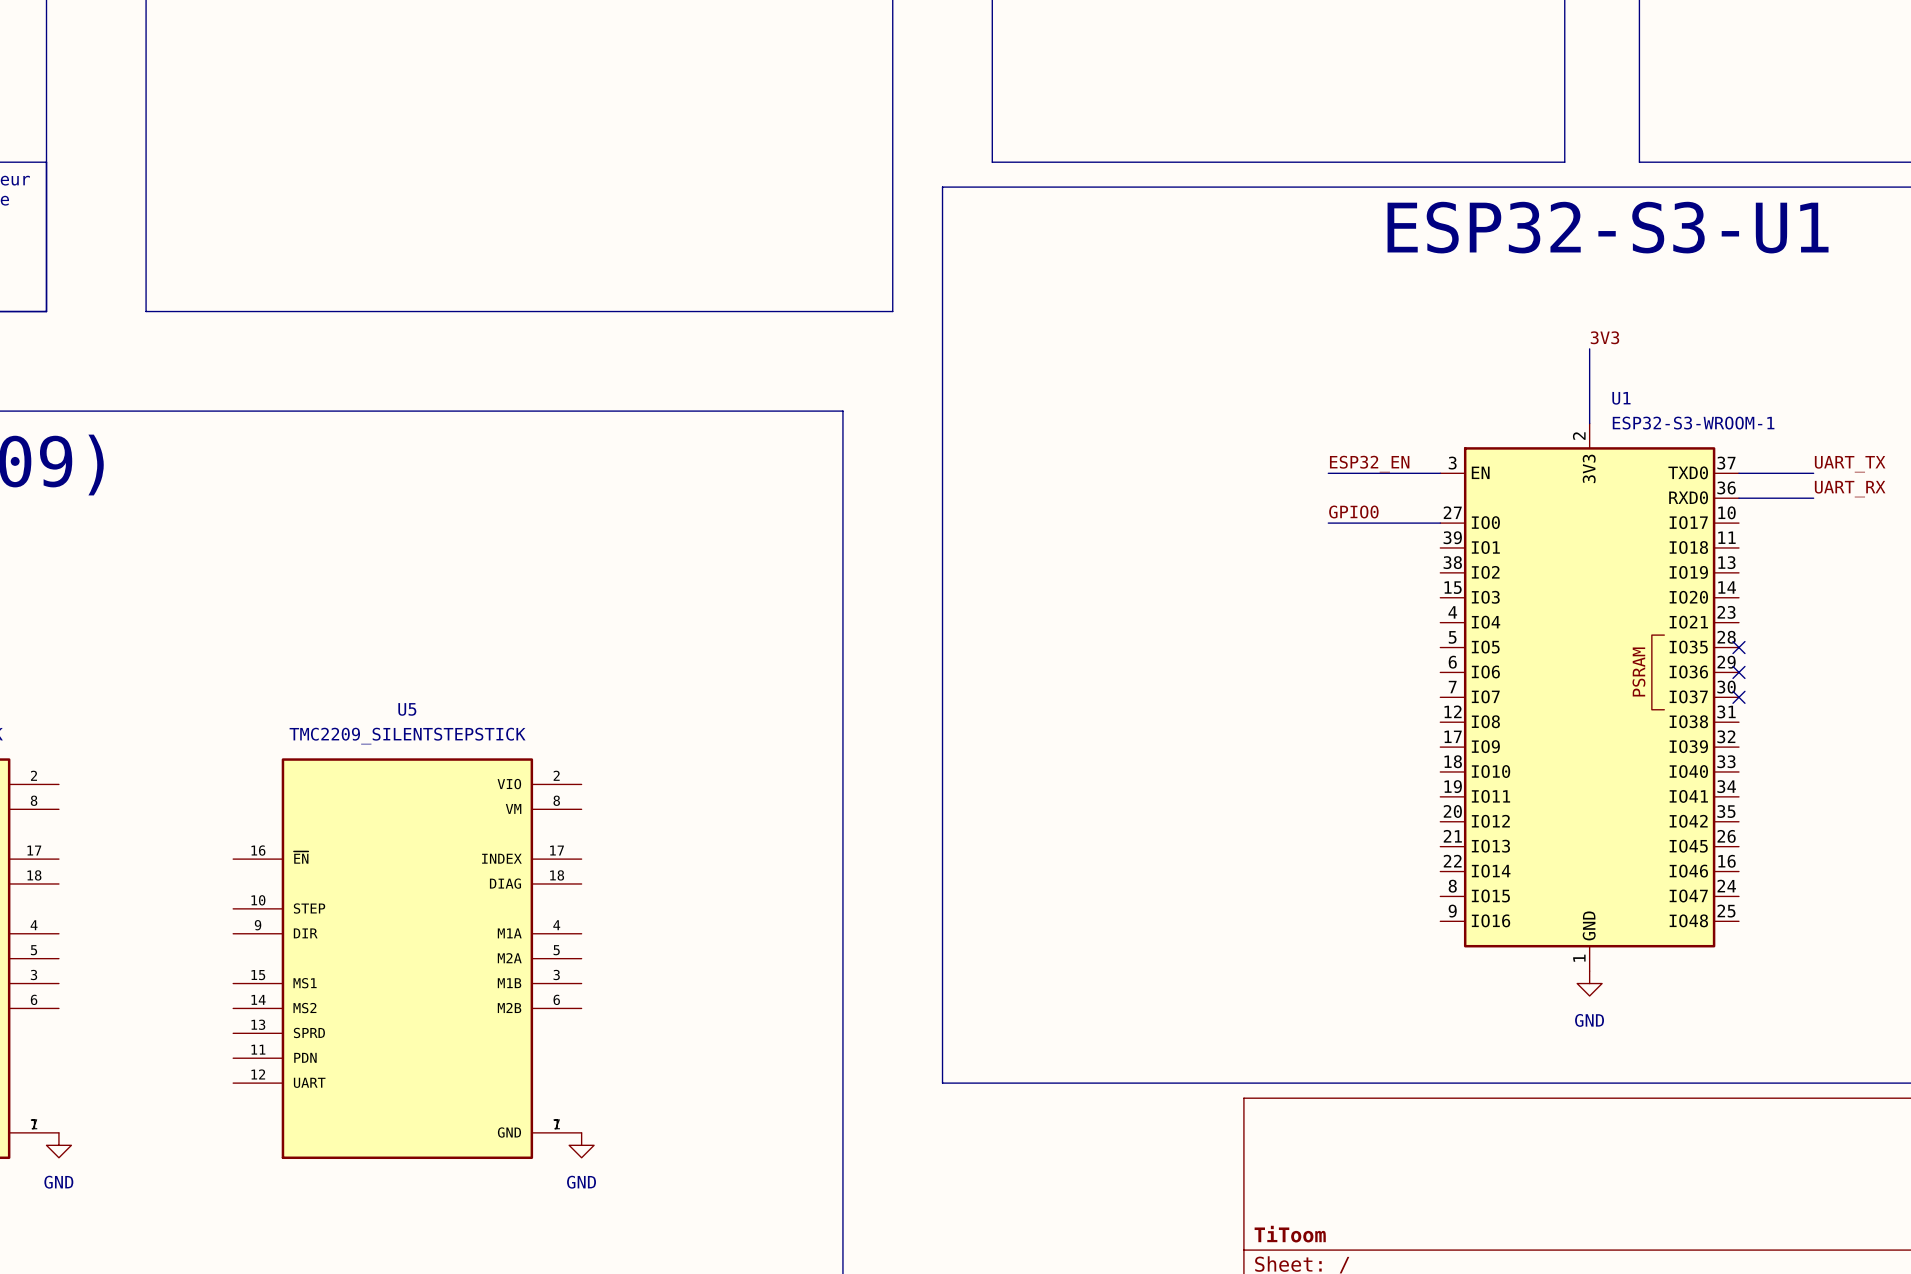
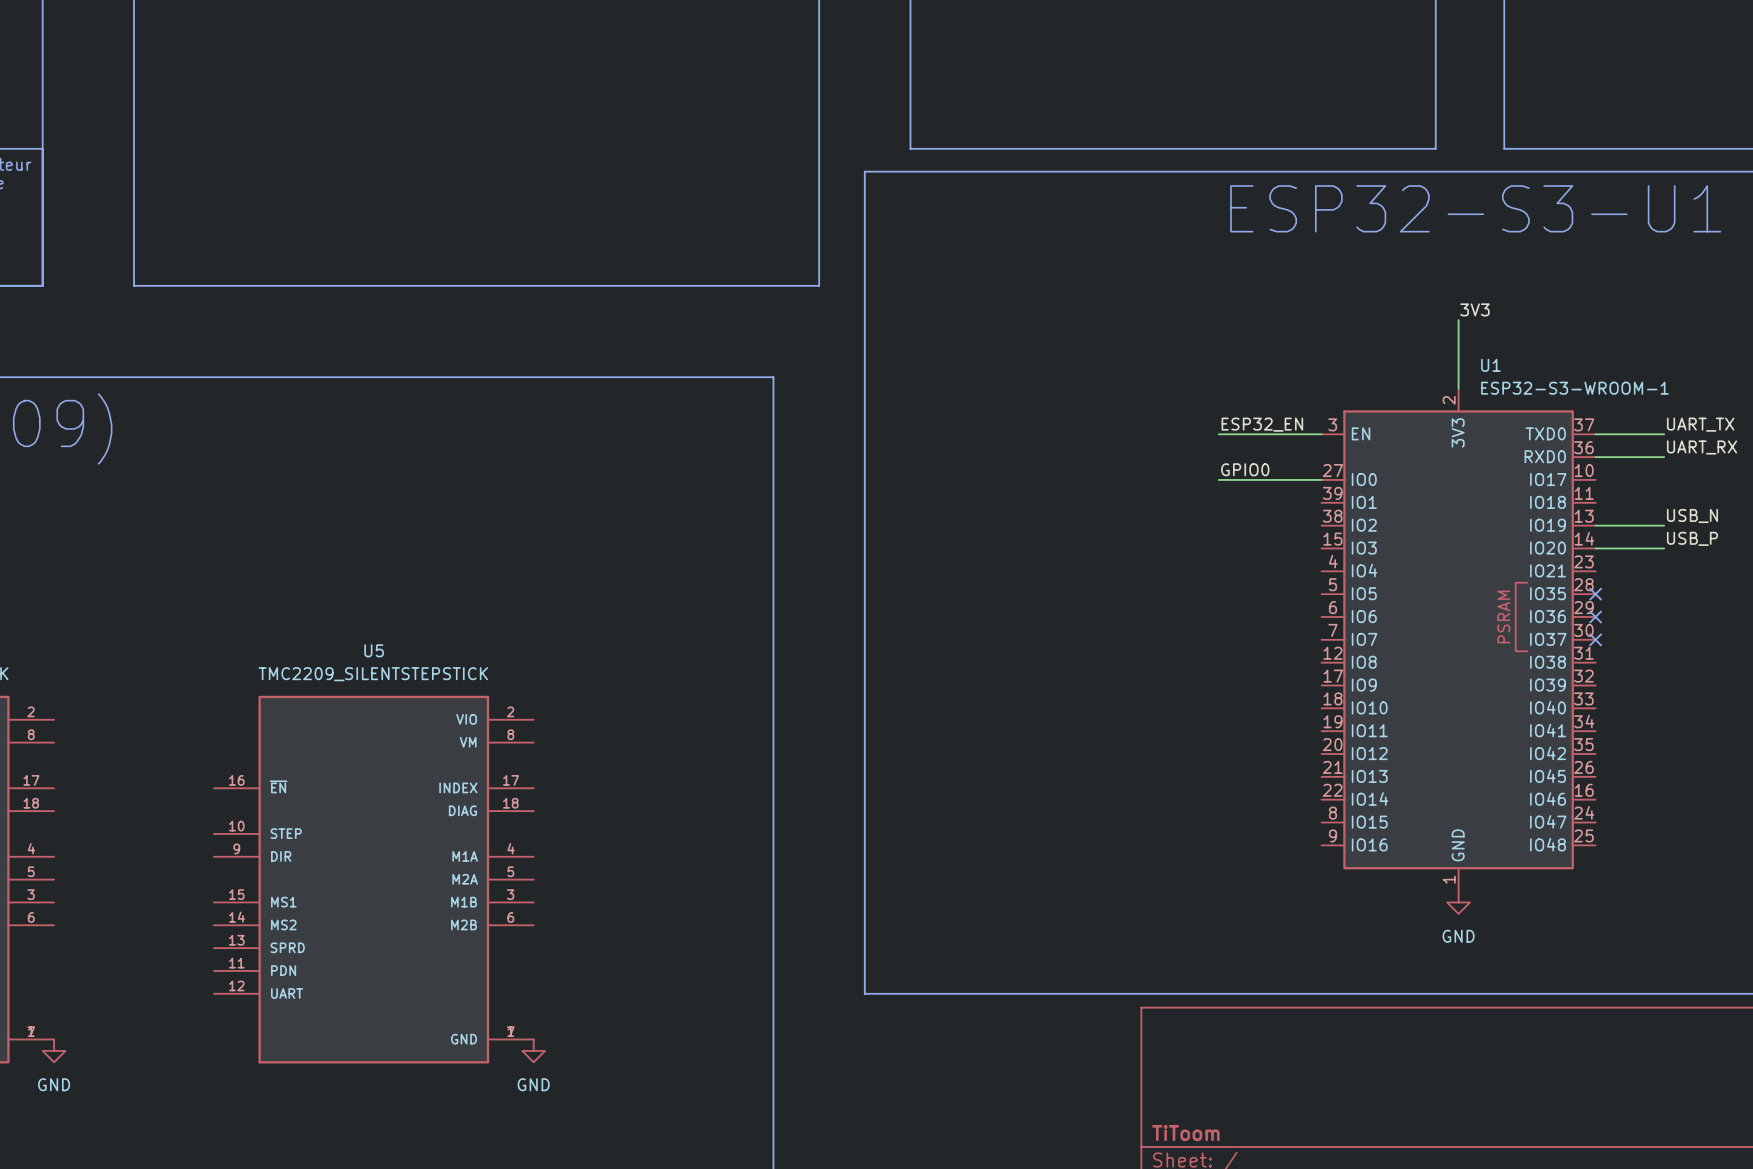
label: none -> USB_N (1692, 515)
wire: none -> (1595, 525) (1664, 525)
label: none -> USB_P (1692, 538)
wire: none -> (1595, 548) (1664, 548)

